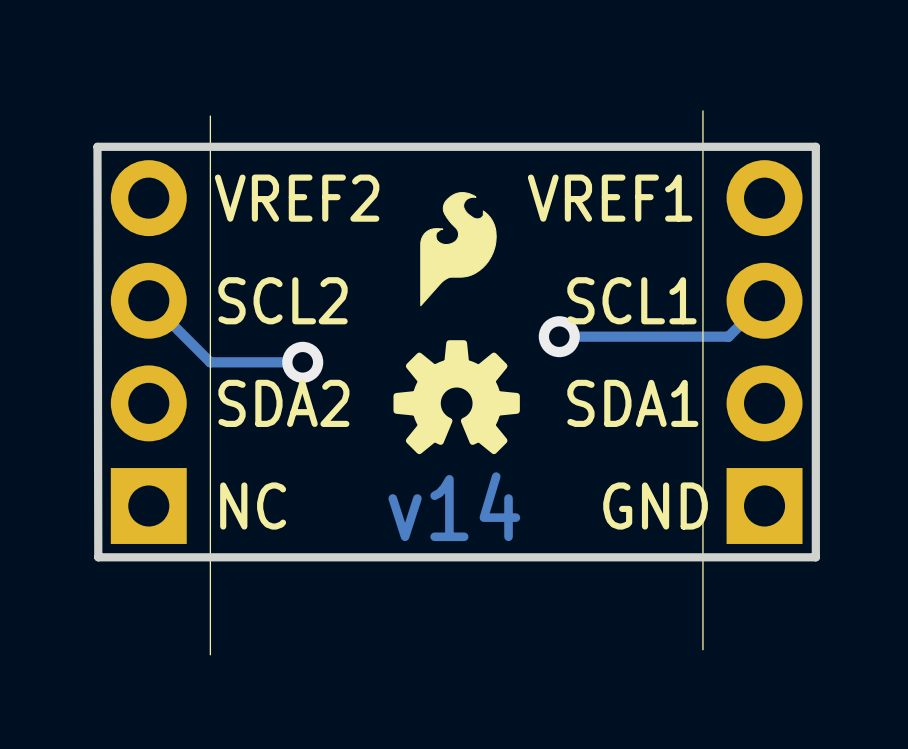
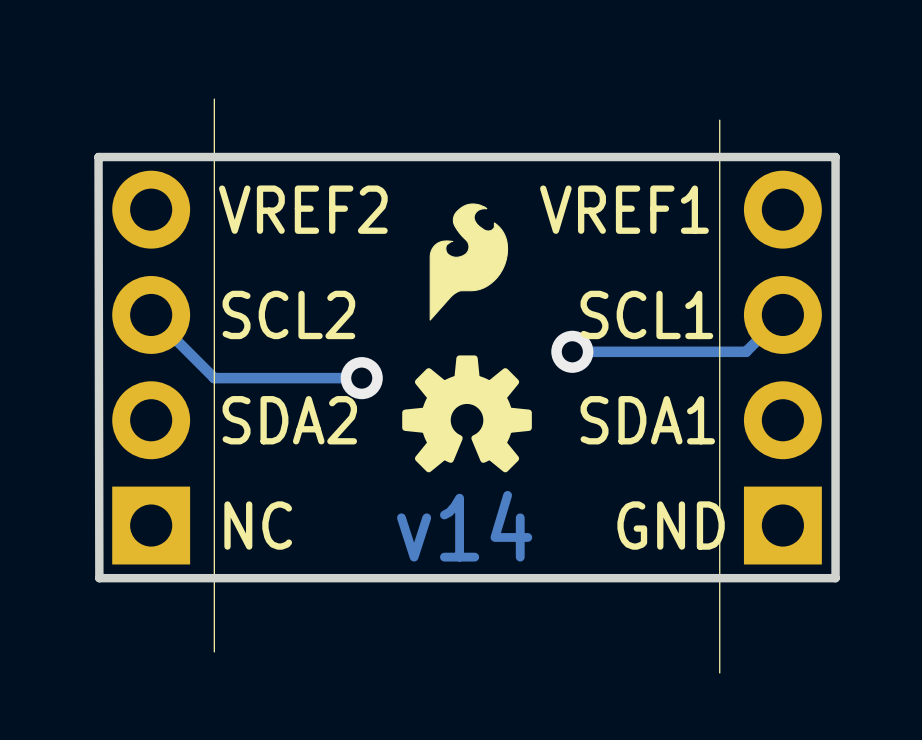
via position: (302, 362) -> (361, 378)
track: none -> (361, 378) (309, 378)
line: (210, 629) (210, 654) -> (214, 99) (214, 125)

